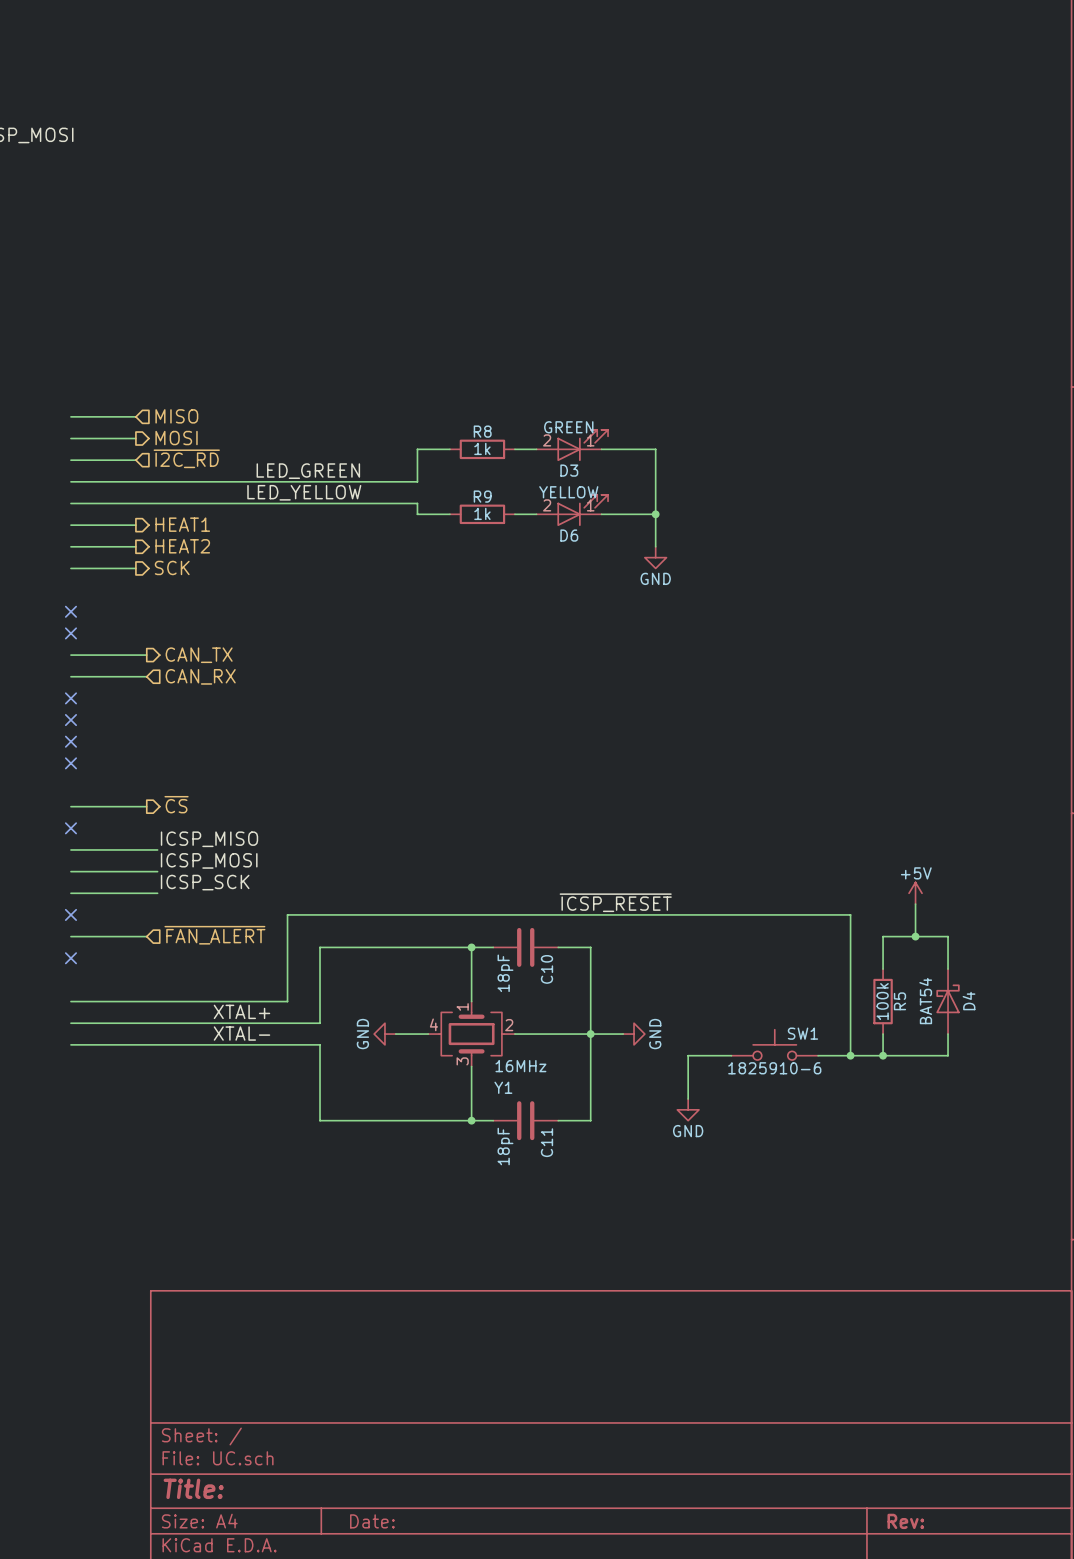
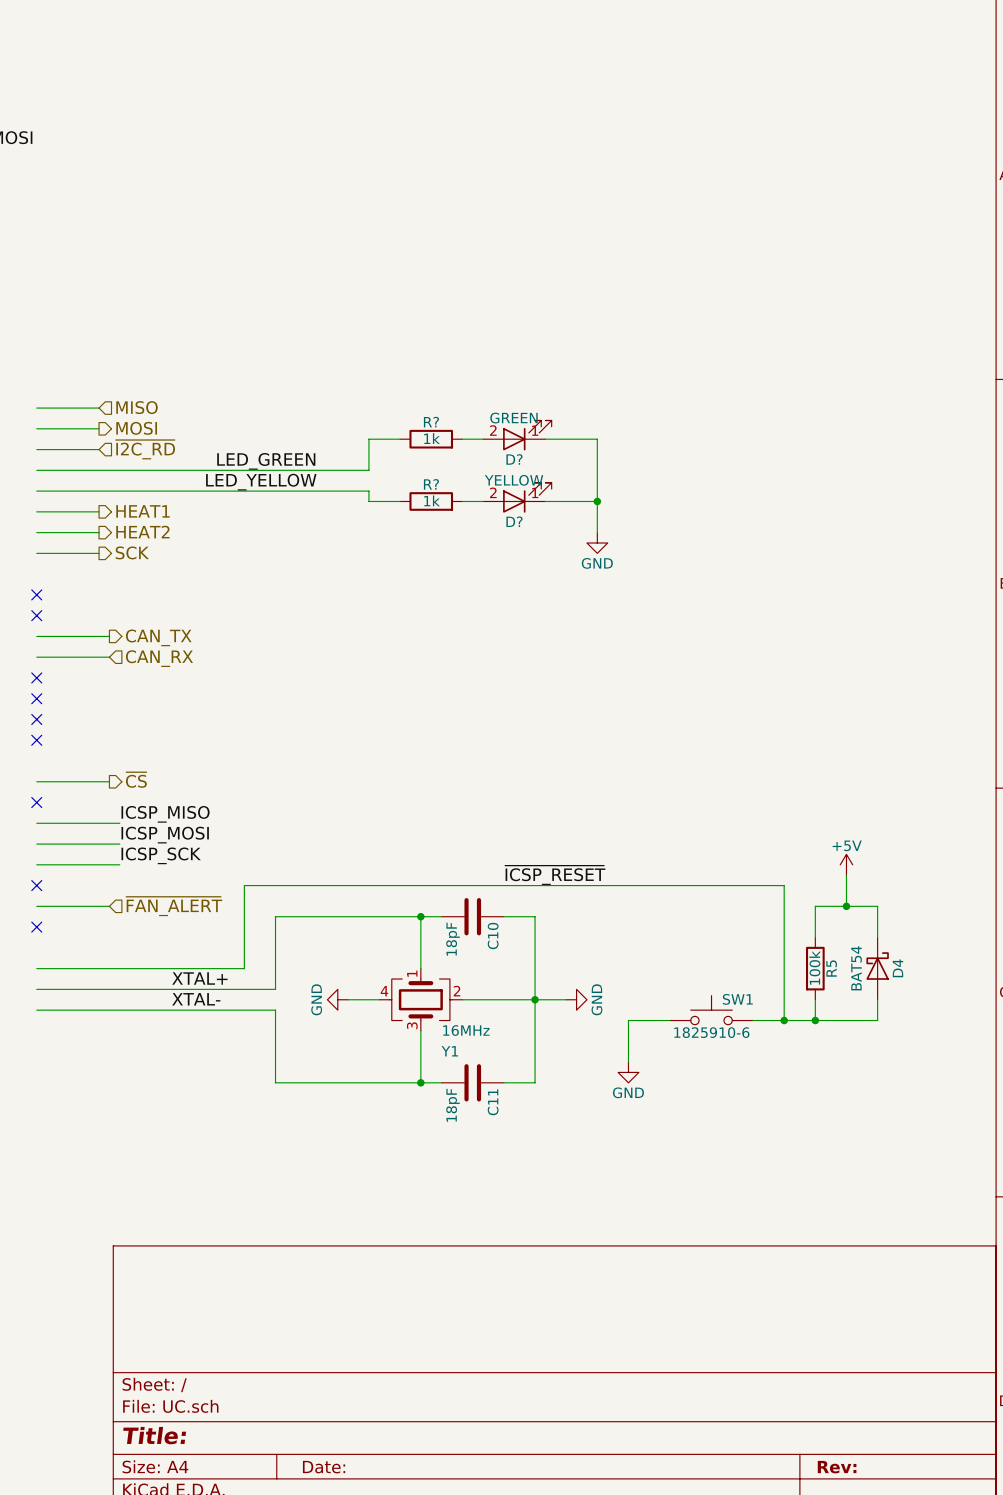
R8 name: R8 (482, 431) -> R? (431, 422)
D3 name: D3 (569, 470) -> D? (514, 459)
R9 name: R9 (482, 496) -> R? (431, 484)
D6 name: D6 (569, 535) -> D? (514, 521)

